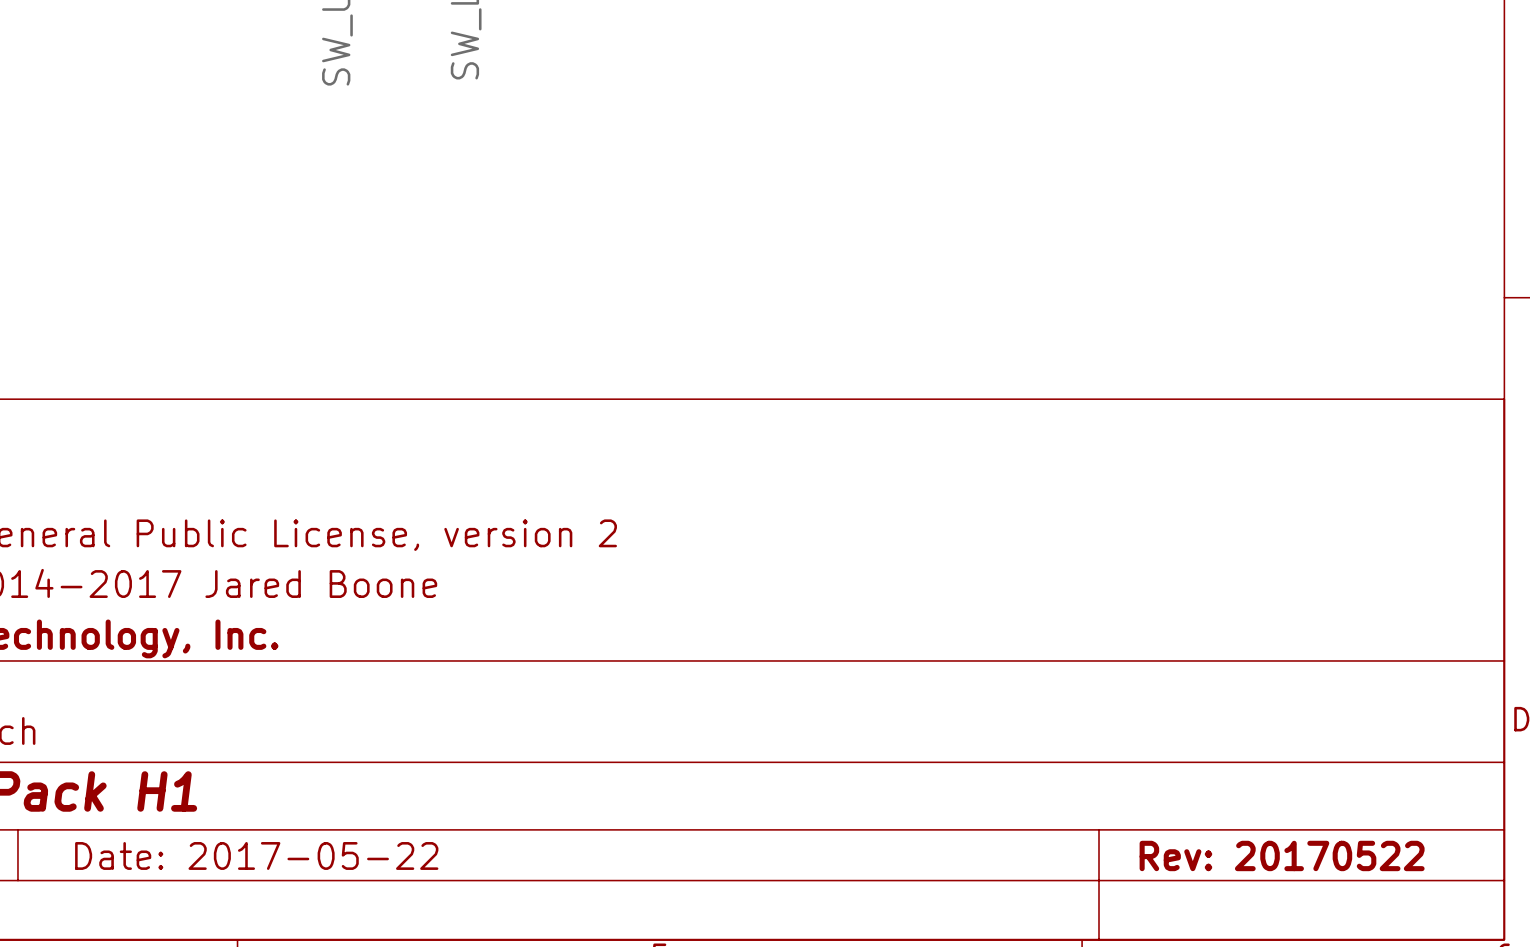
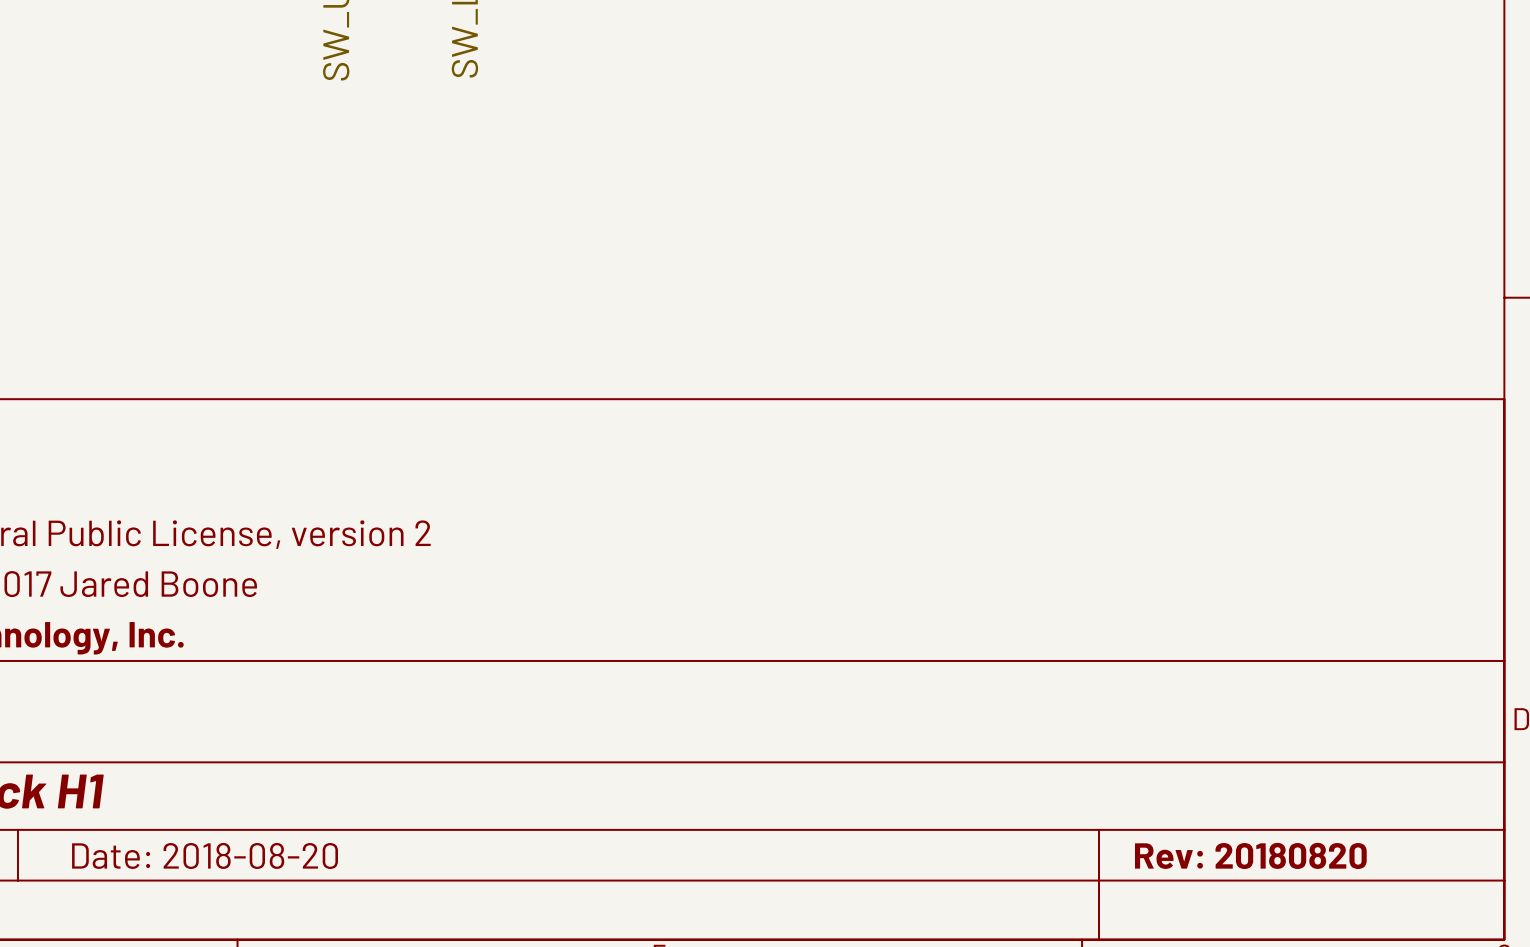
title block: Date: 2017-05-22 (256, 855) -> Date: 2018-08-20 (205, 855)
title block: Rev: 20170522 (1282, 855) -> Rev: 20180820 (1250, 855)

